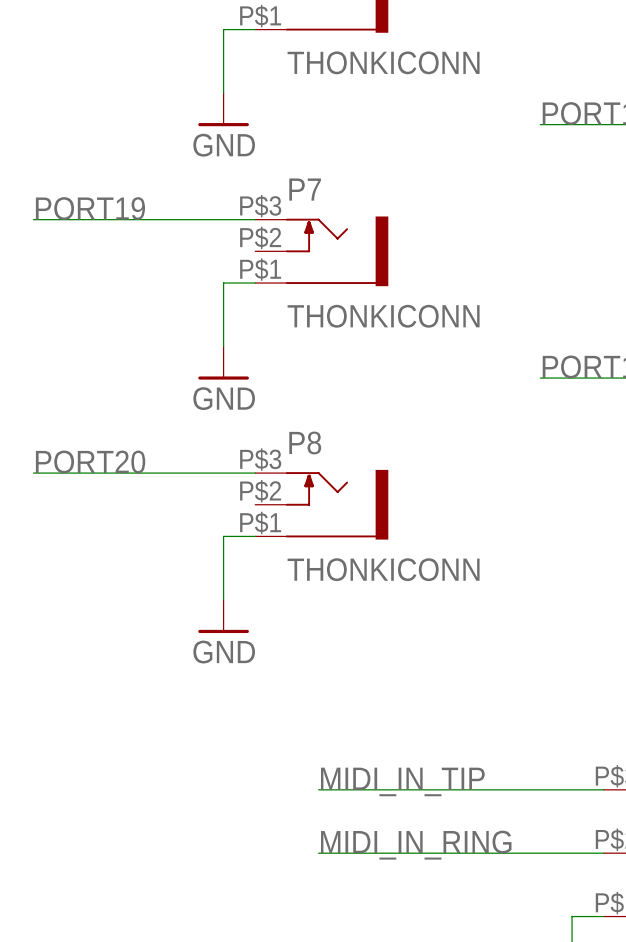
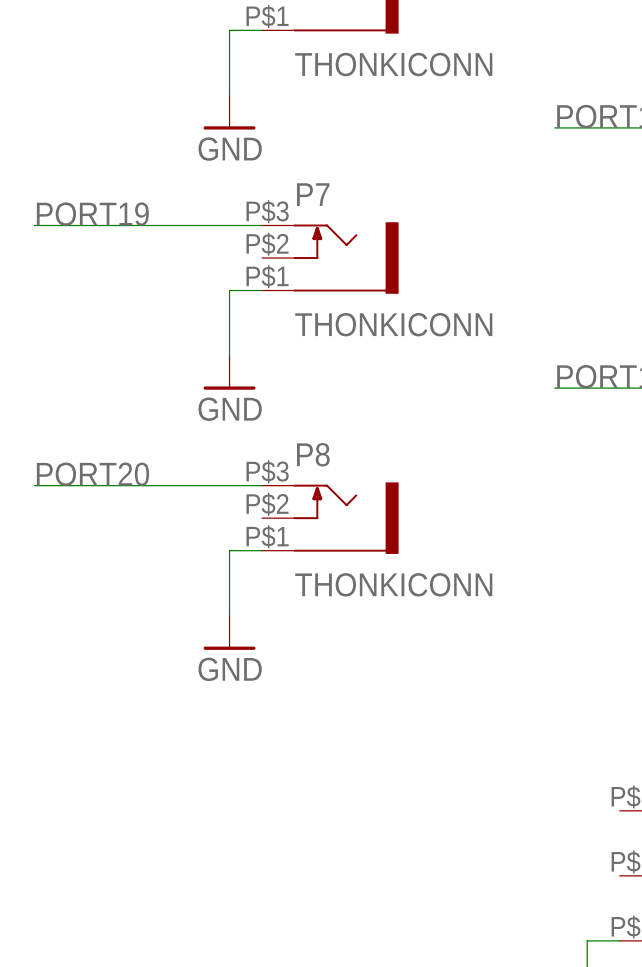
label: MIDI_IN_TIP (402, 781) -> none
wire: (318, 789) (603, 789) -> none
label: MIDI_IN_RING (416, 845) -> none
wire: (318, 853) (603, 853) -> none

